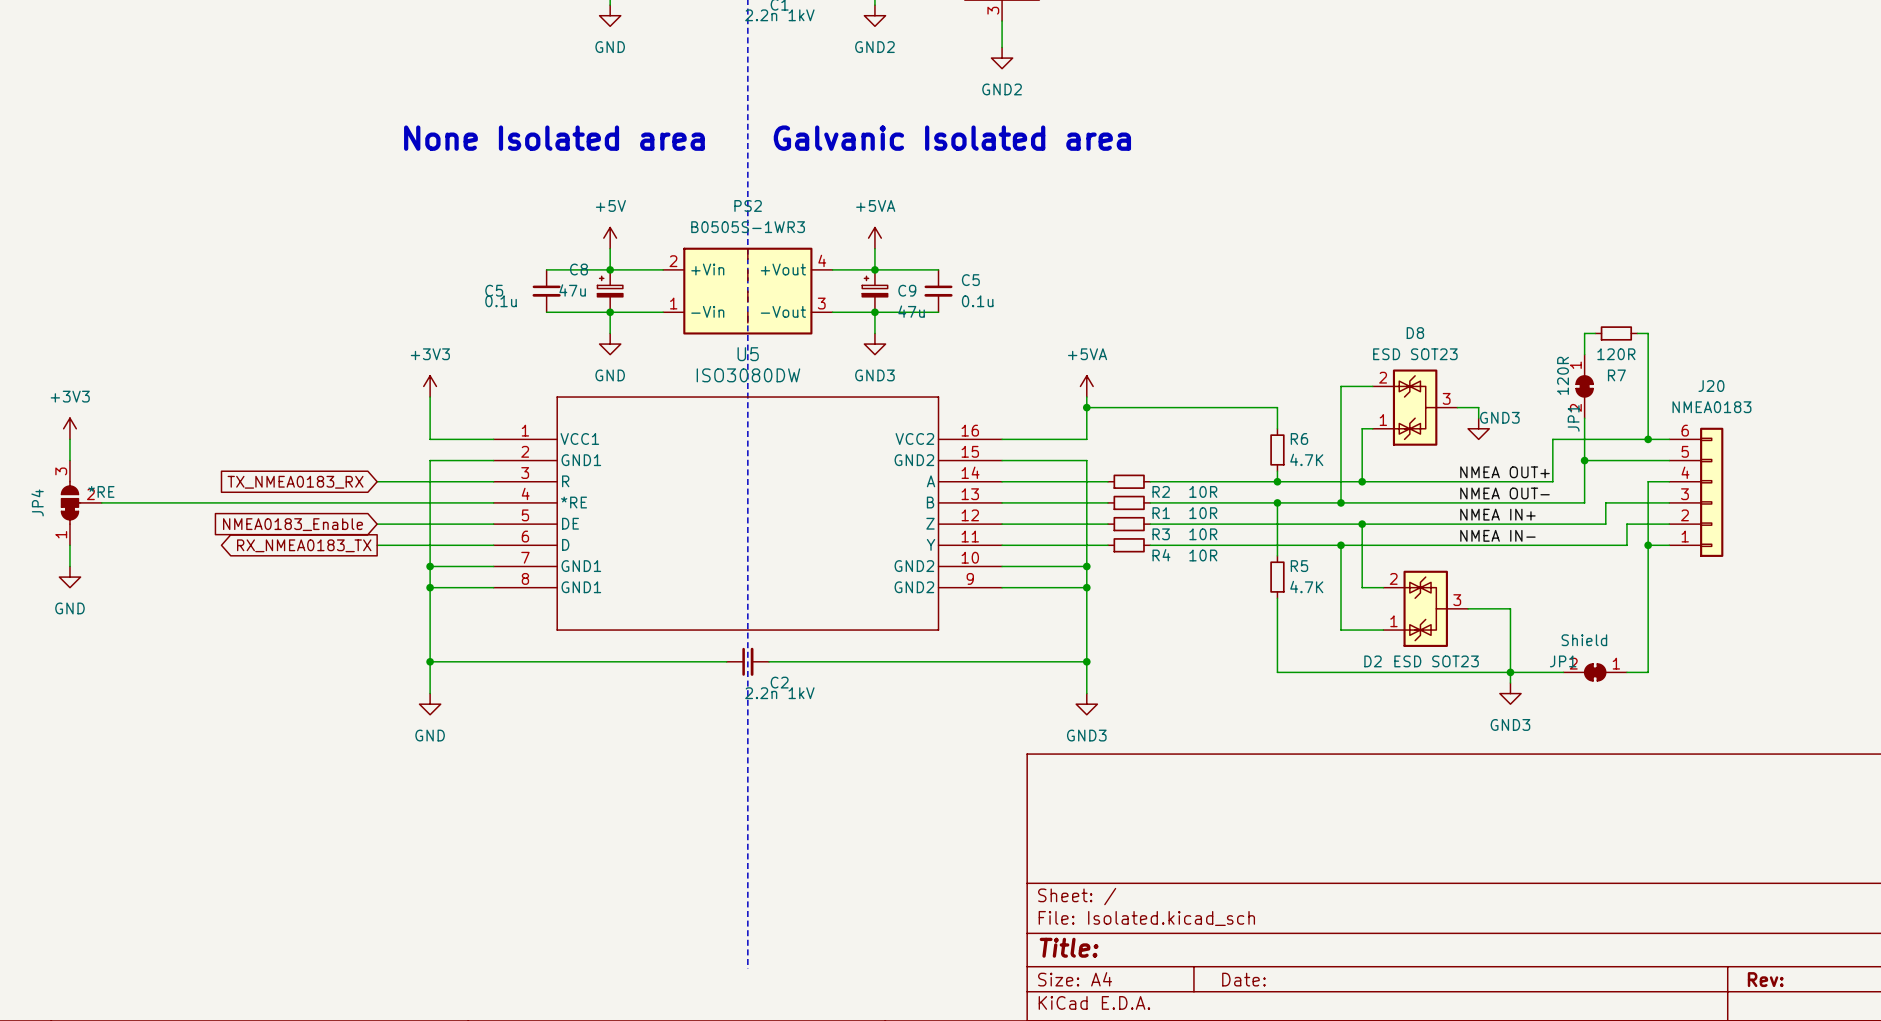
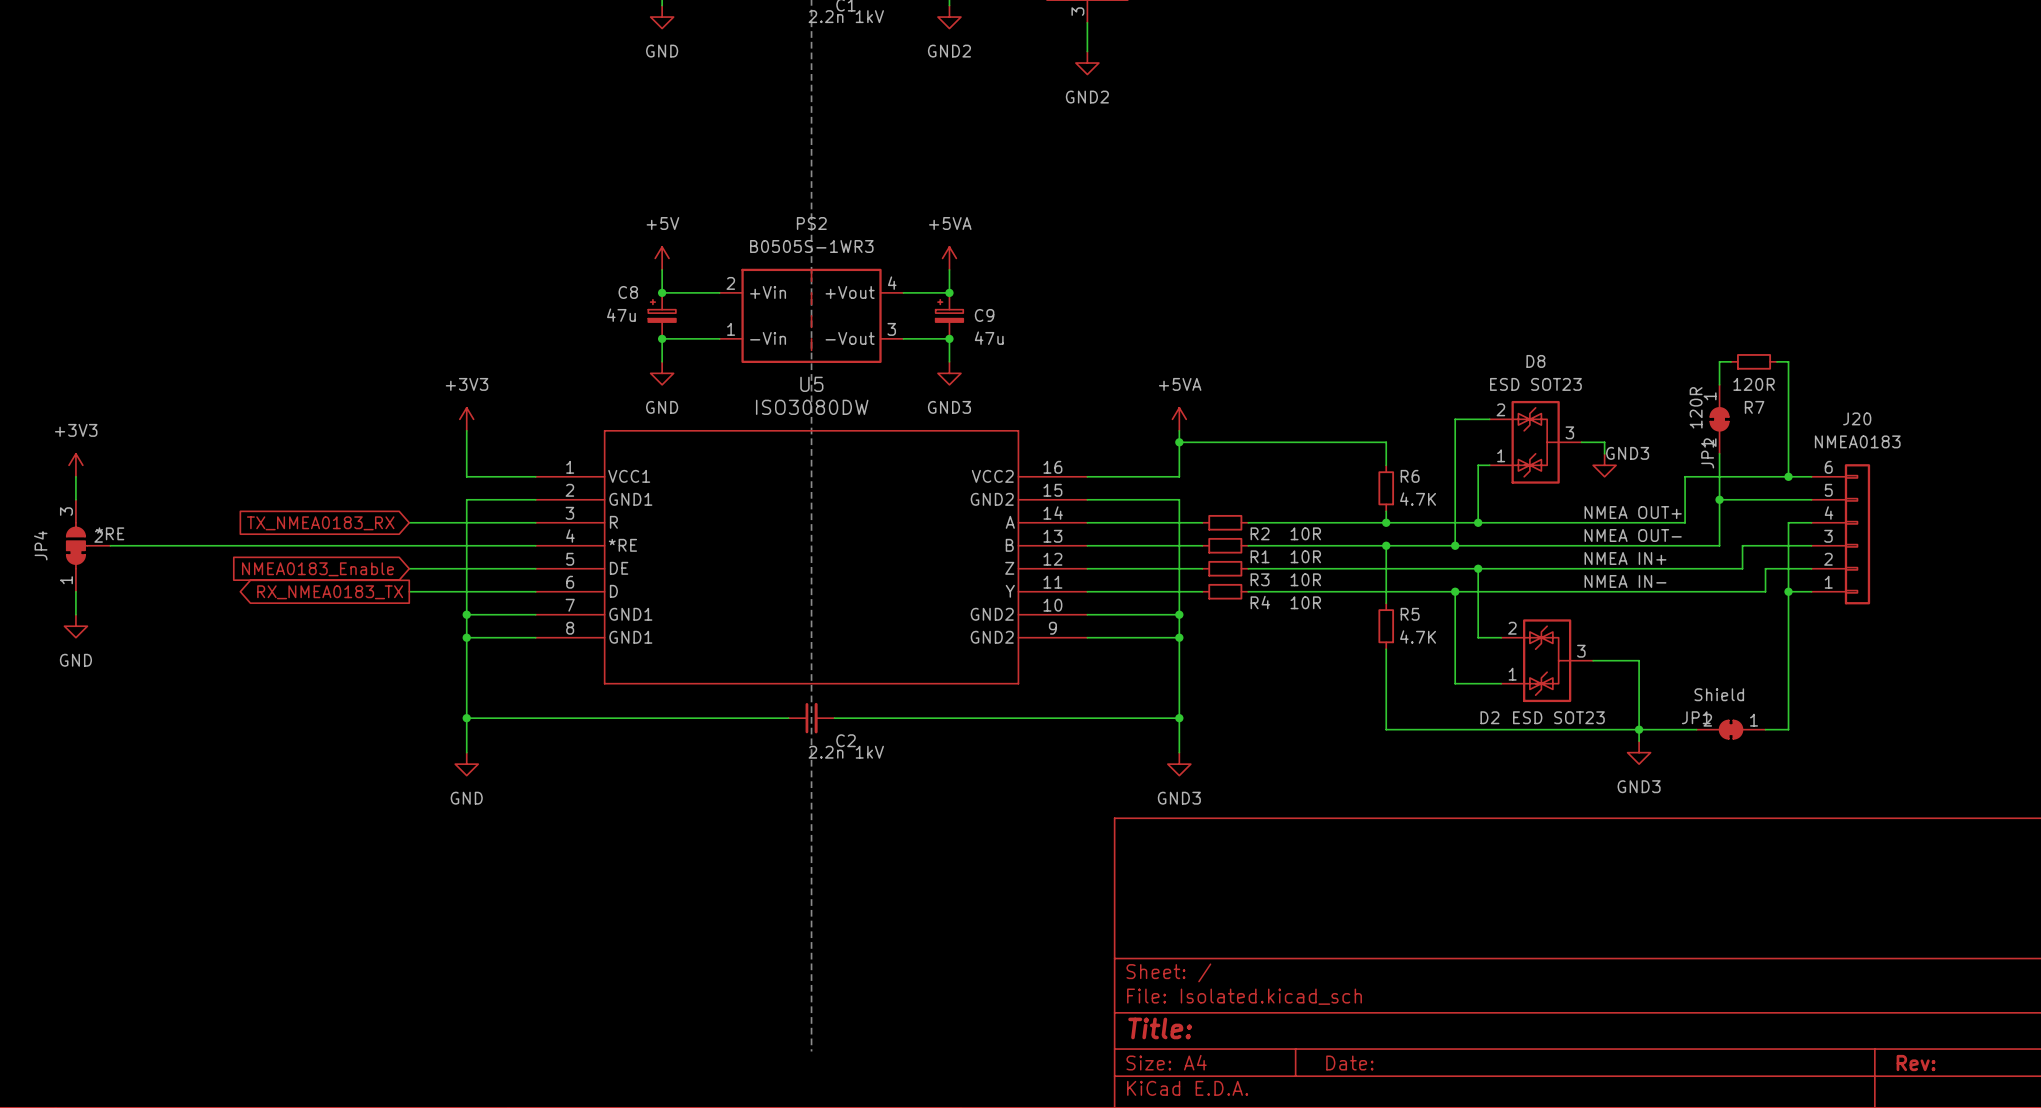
text: None Isolated area (554, 138) -> none
text: Galvanic Isolated area (952, 138) -> none
wire: (546, 269) (610, 269) -> none
wire: (874, 269) (938, 269) -> none
C5: 0.1u (546, 291) -> none
C5: 0.1u (938, 291) -> none
wire: (546, 312) (610, 312) -> none
wire: (874, 312) (938, 312) -> none

